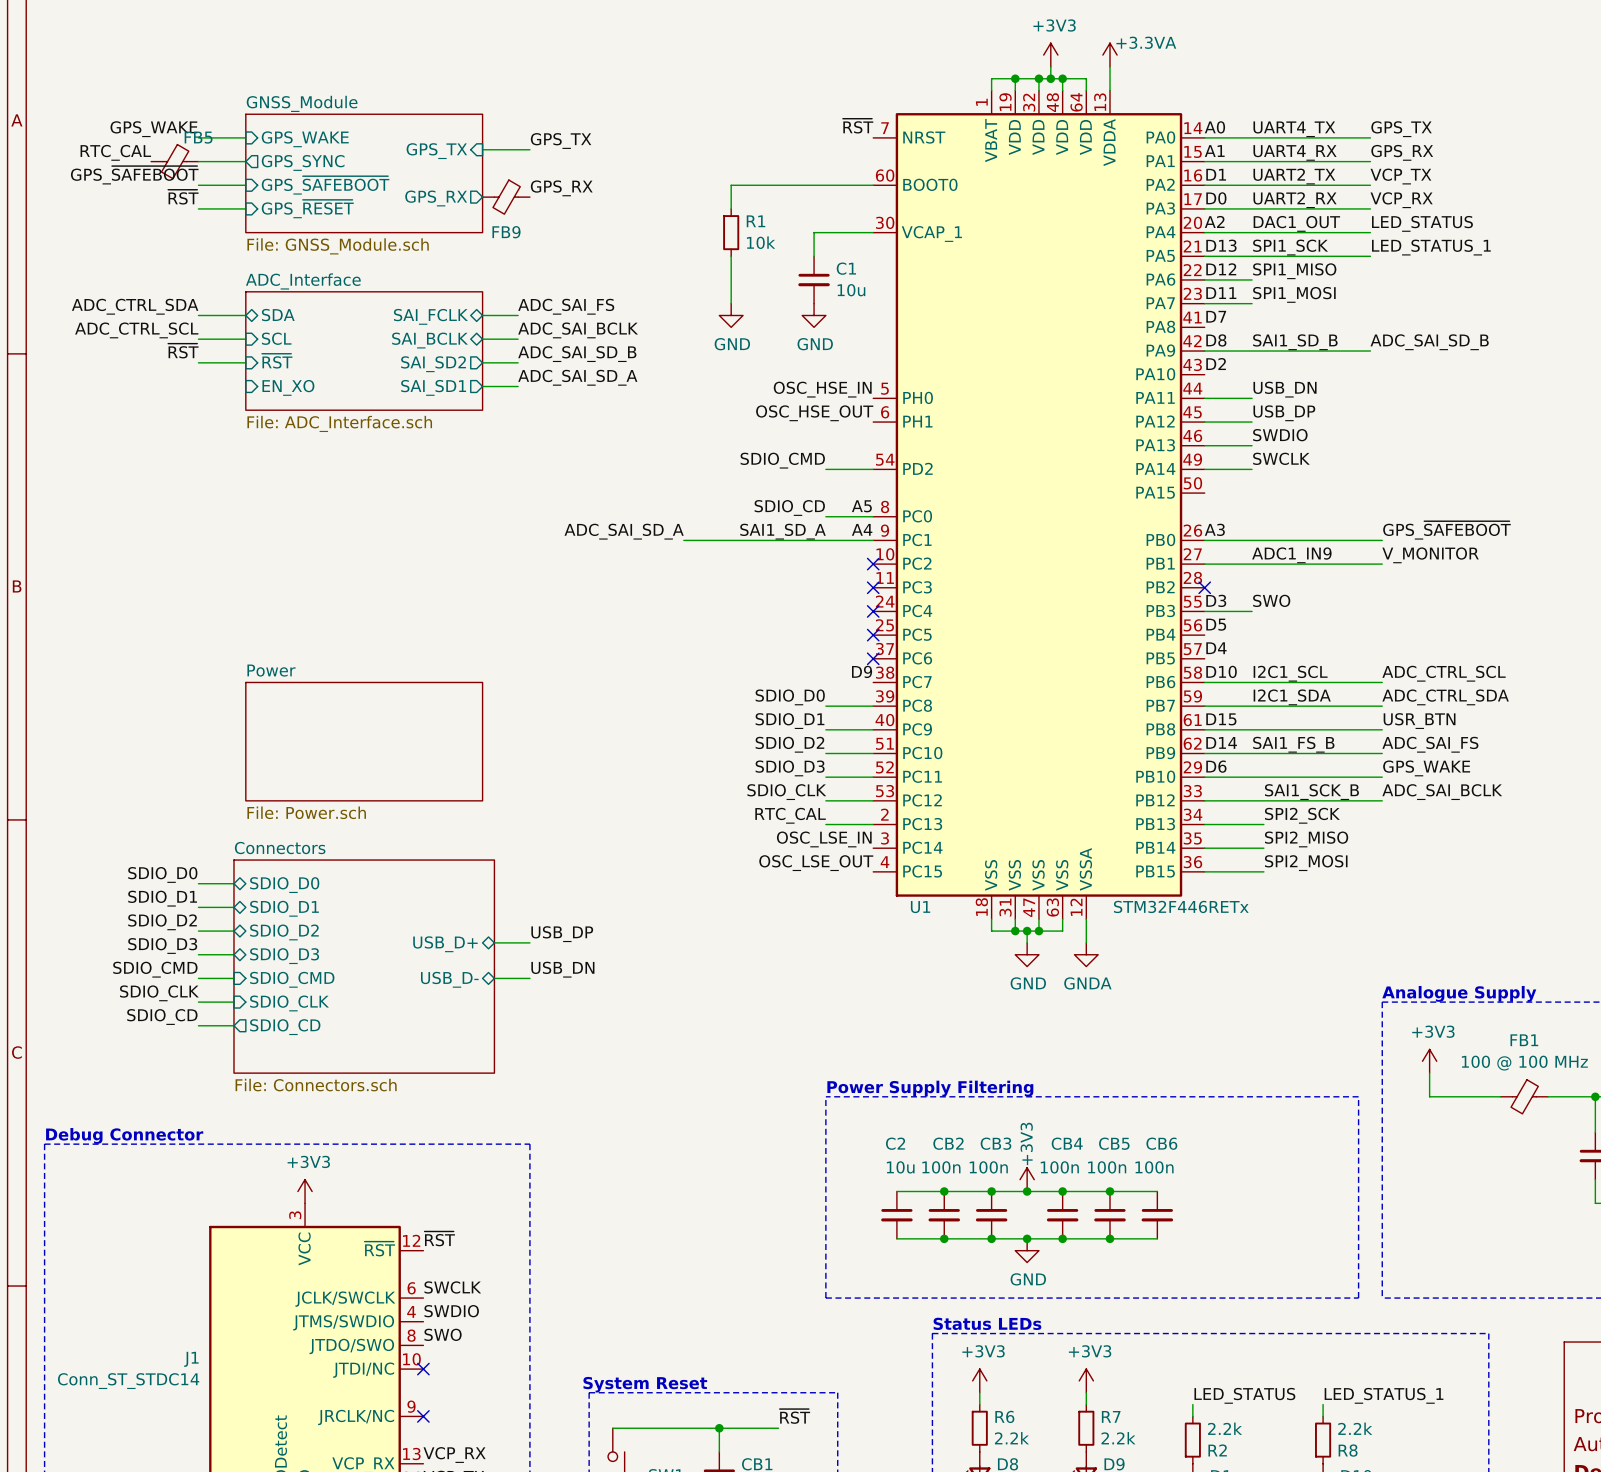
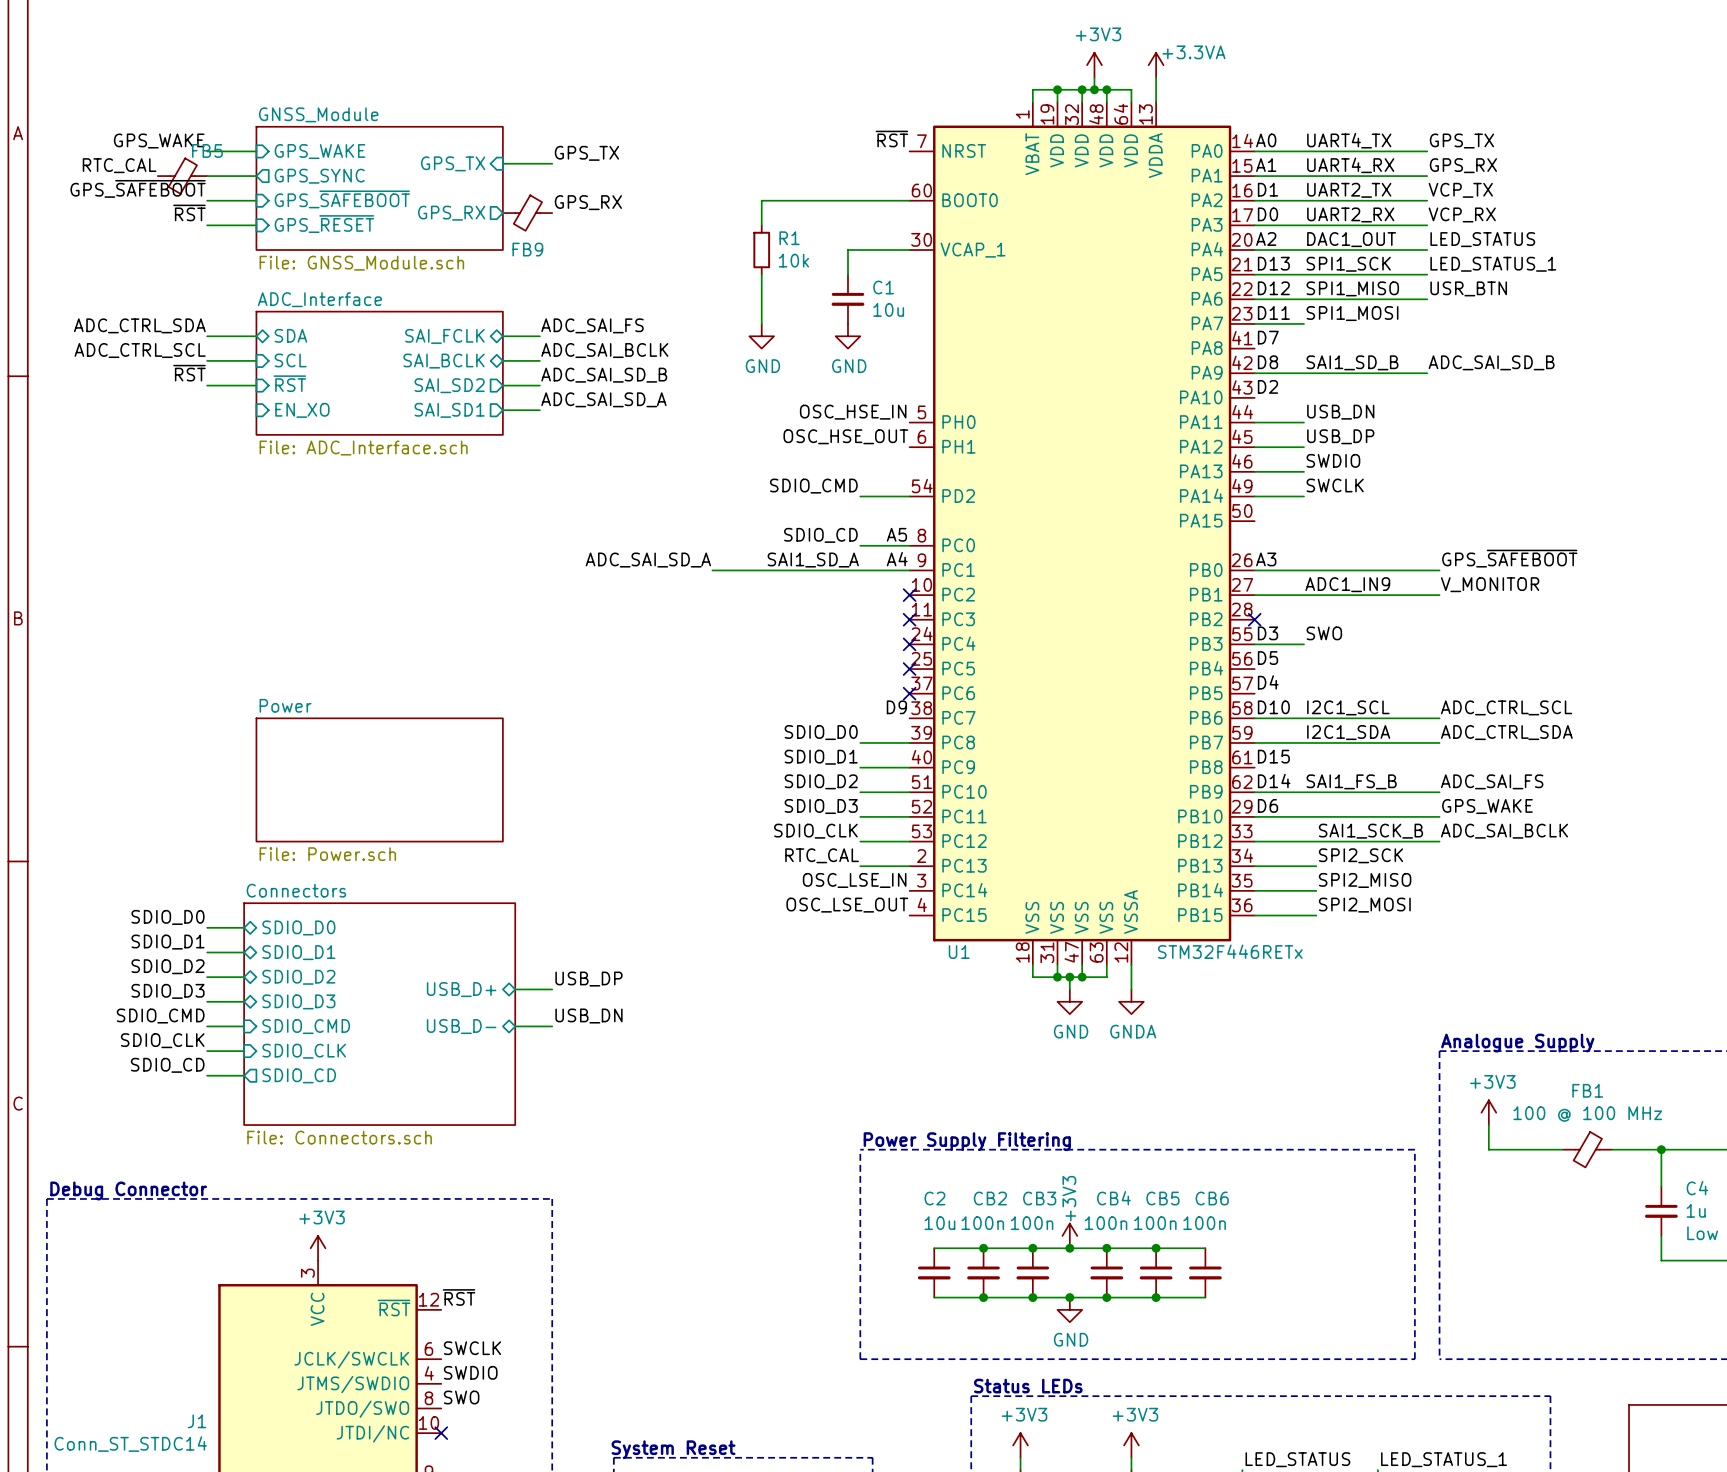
label: none -> USR_BTN (1468, 288)
wire: none -> (1303, 299) (1427, 299)
label: USR_BTN (1419, 721) -> none
wire: (1204, 729) (1382, 729) -> none

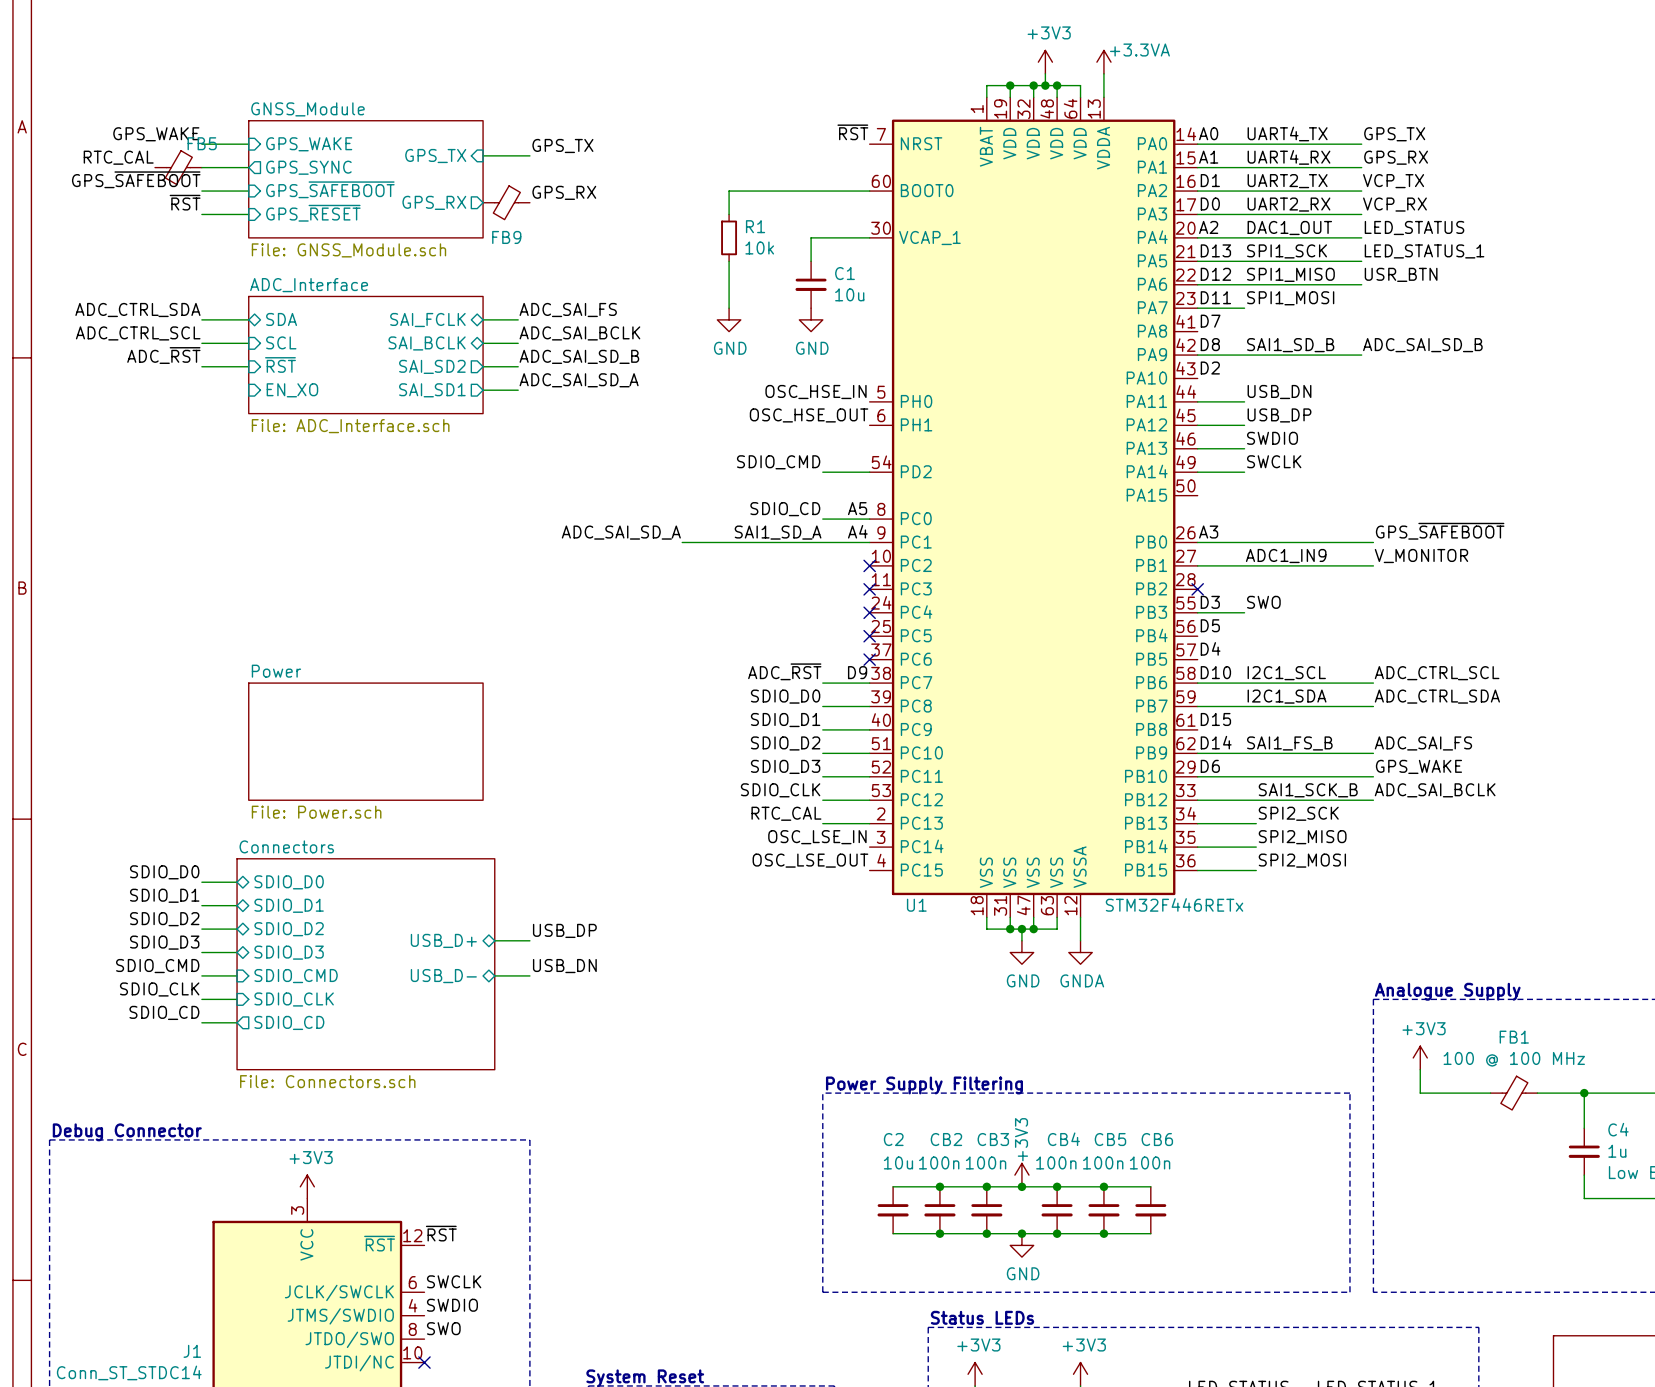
label: ~{RST} (189, 373) -> ADC_~{RST} (163, 355)
label: none -> ADC_~{RST} (784, 671)
wire: none -> (822, 683) (869, 683)

